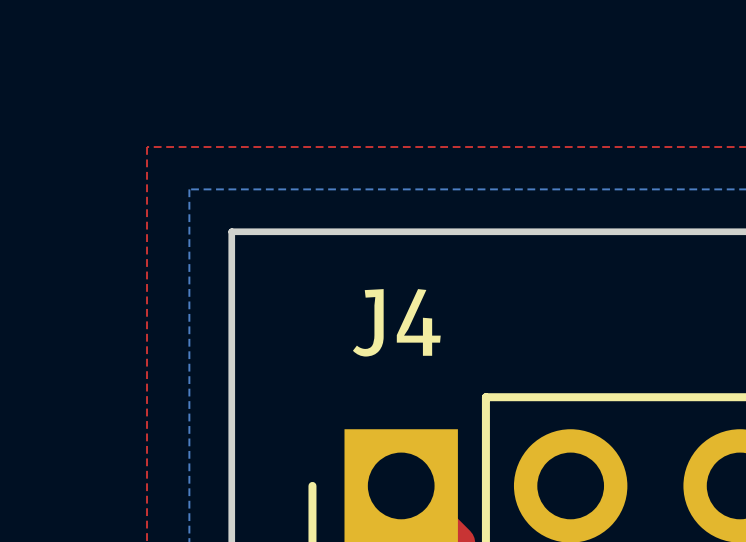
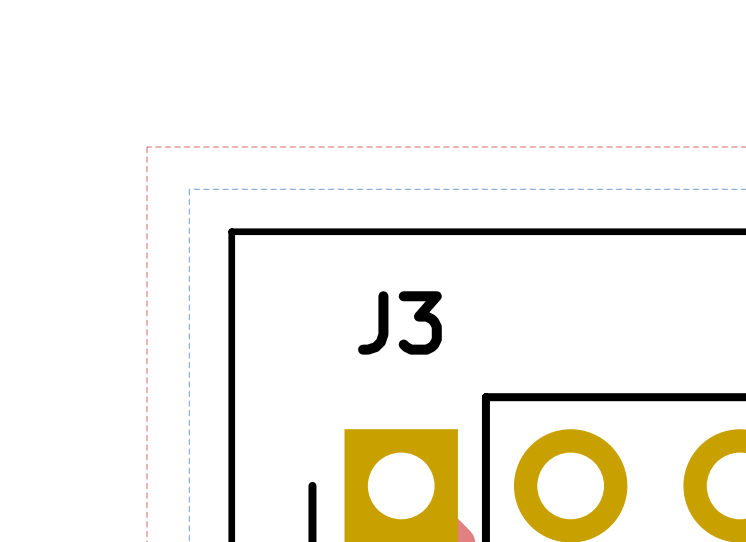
J4 name: J4 (396, 322) -> J3 (399, 322)

